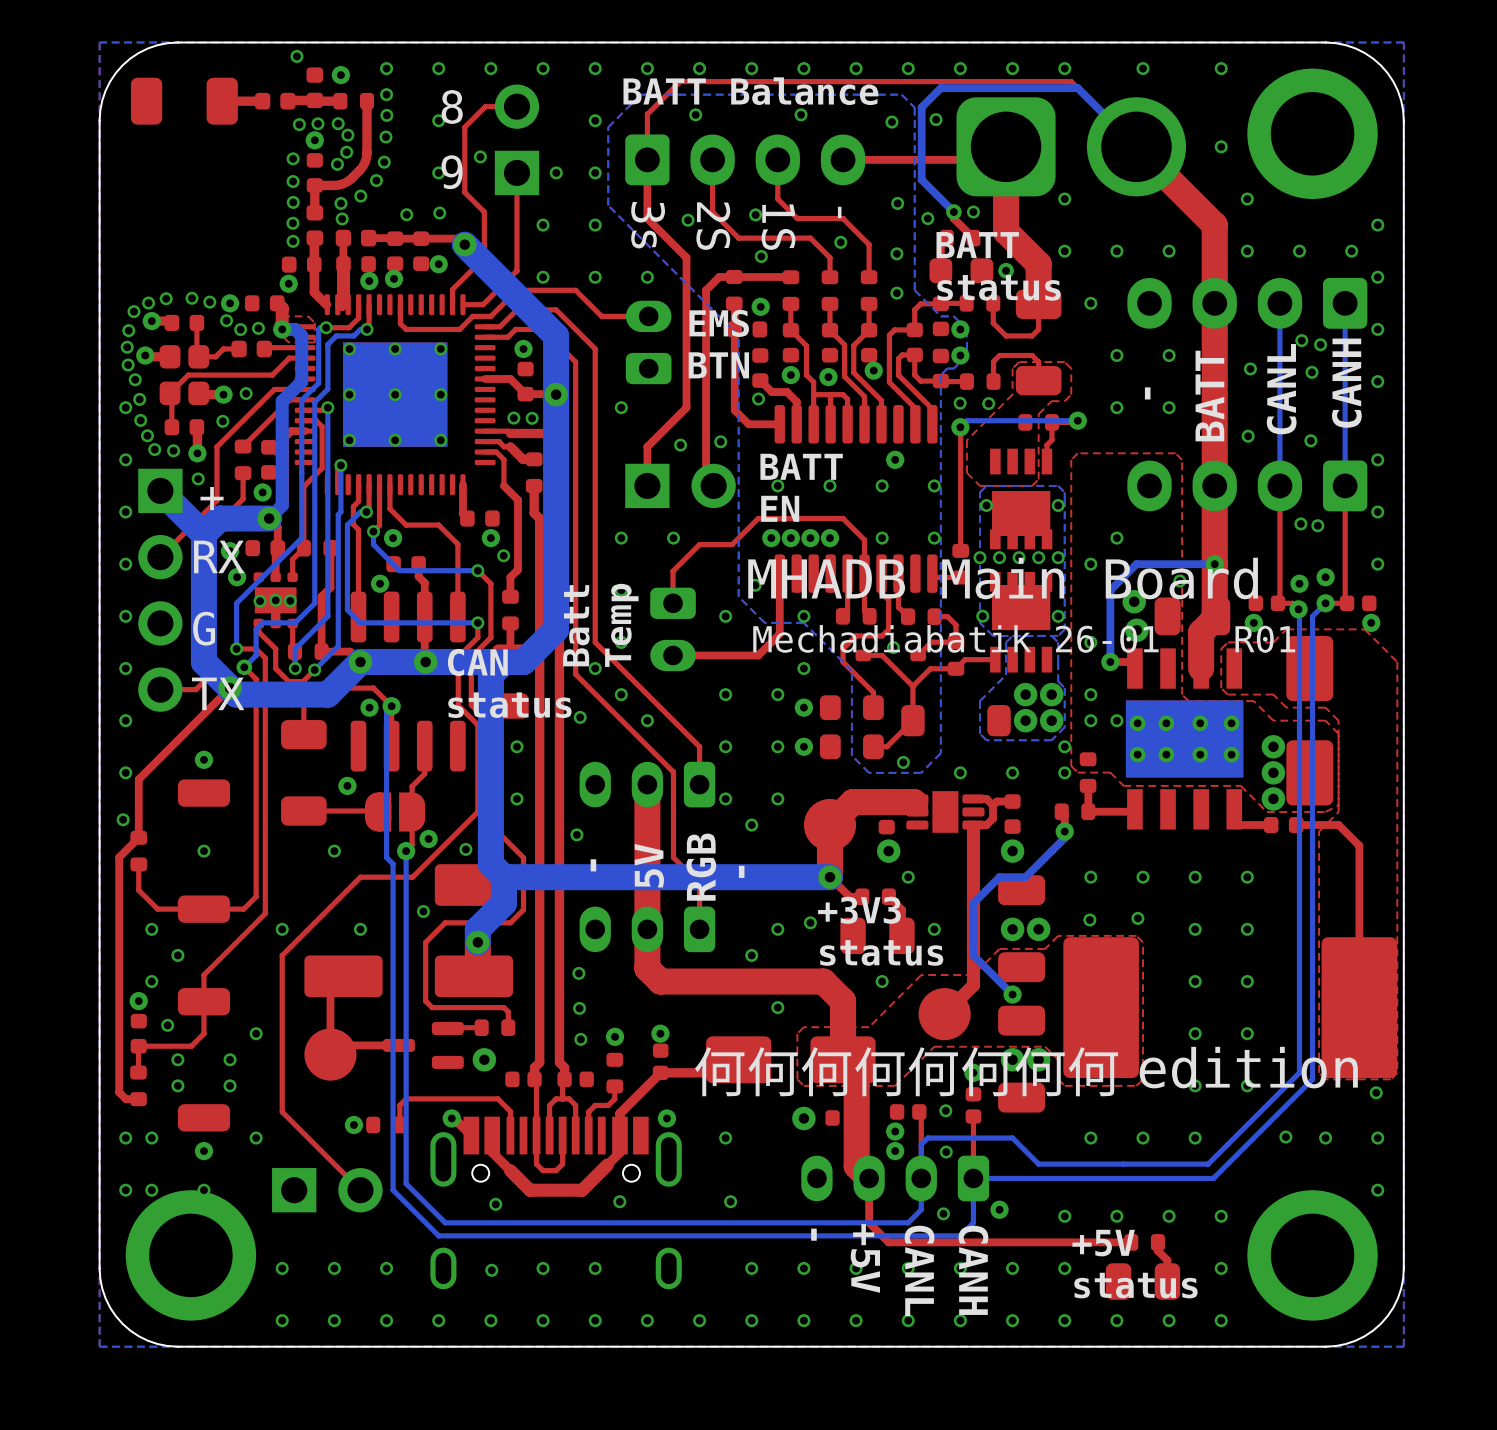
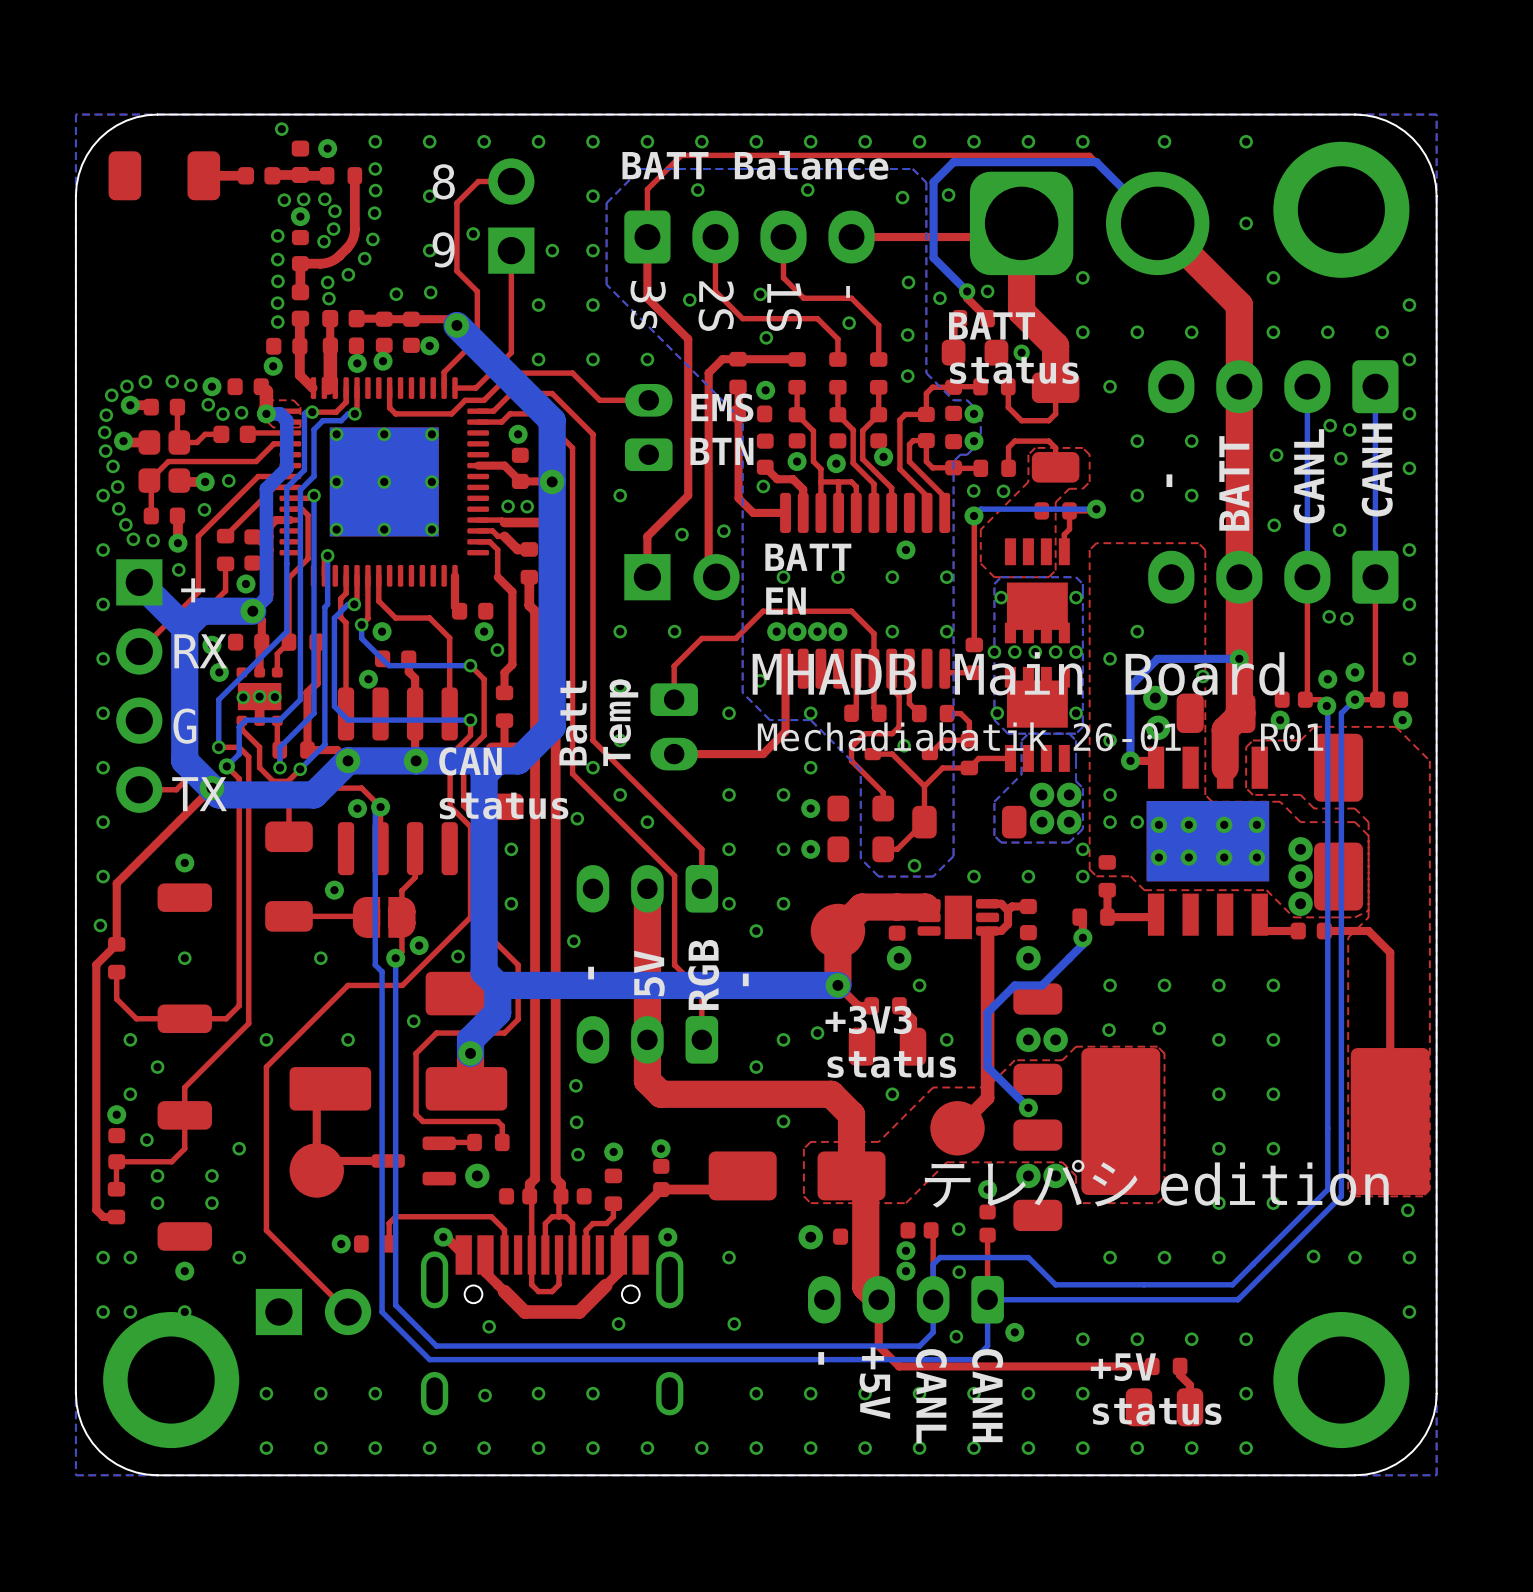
text: none -> テレパシ (1031, 1183)
text: 何何何何何何何何 (906, 1071) -> none

